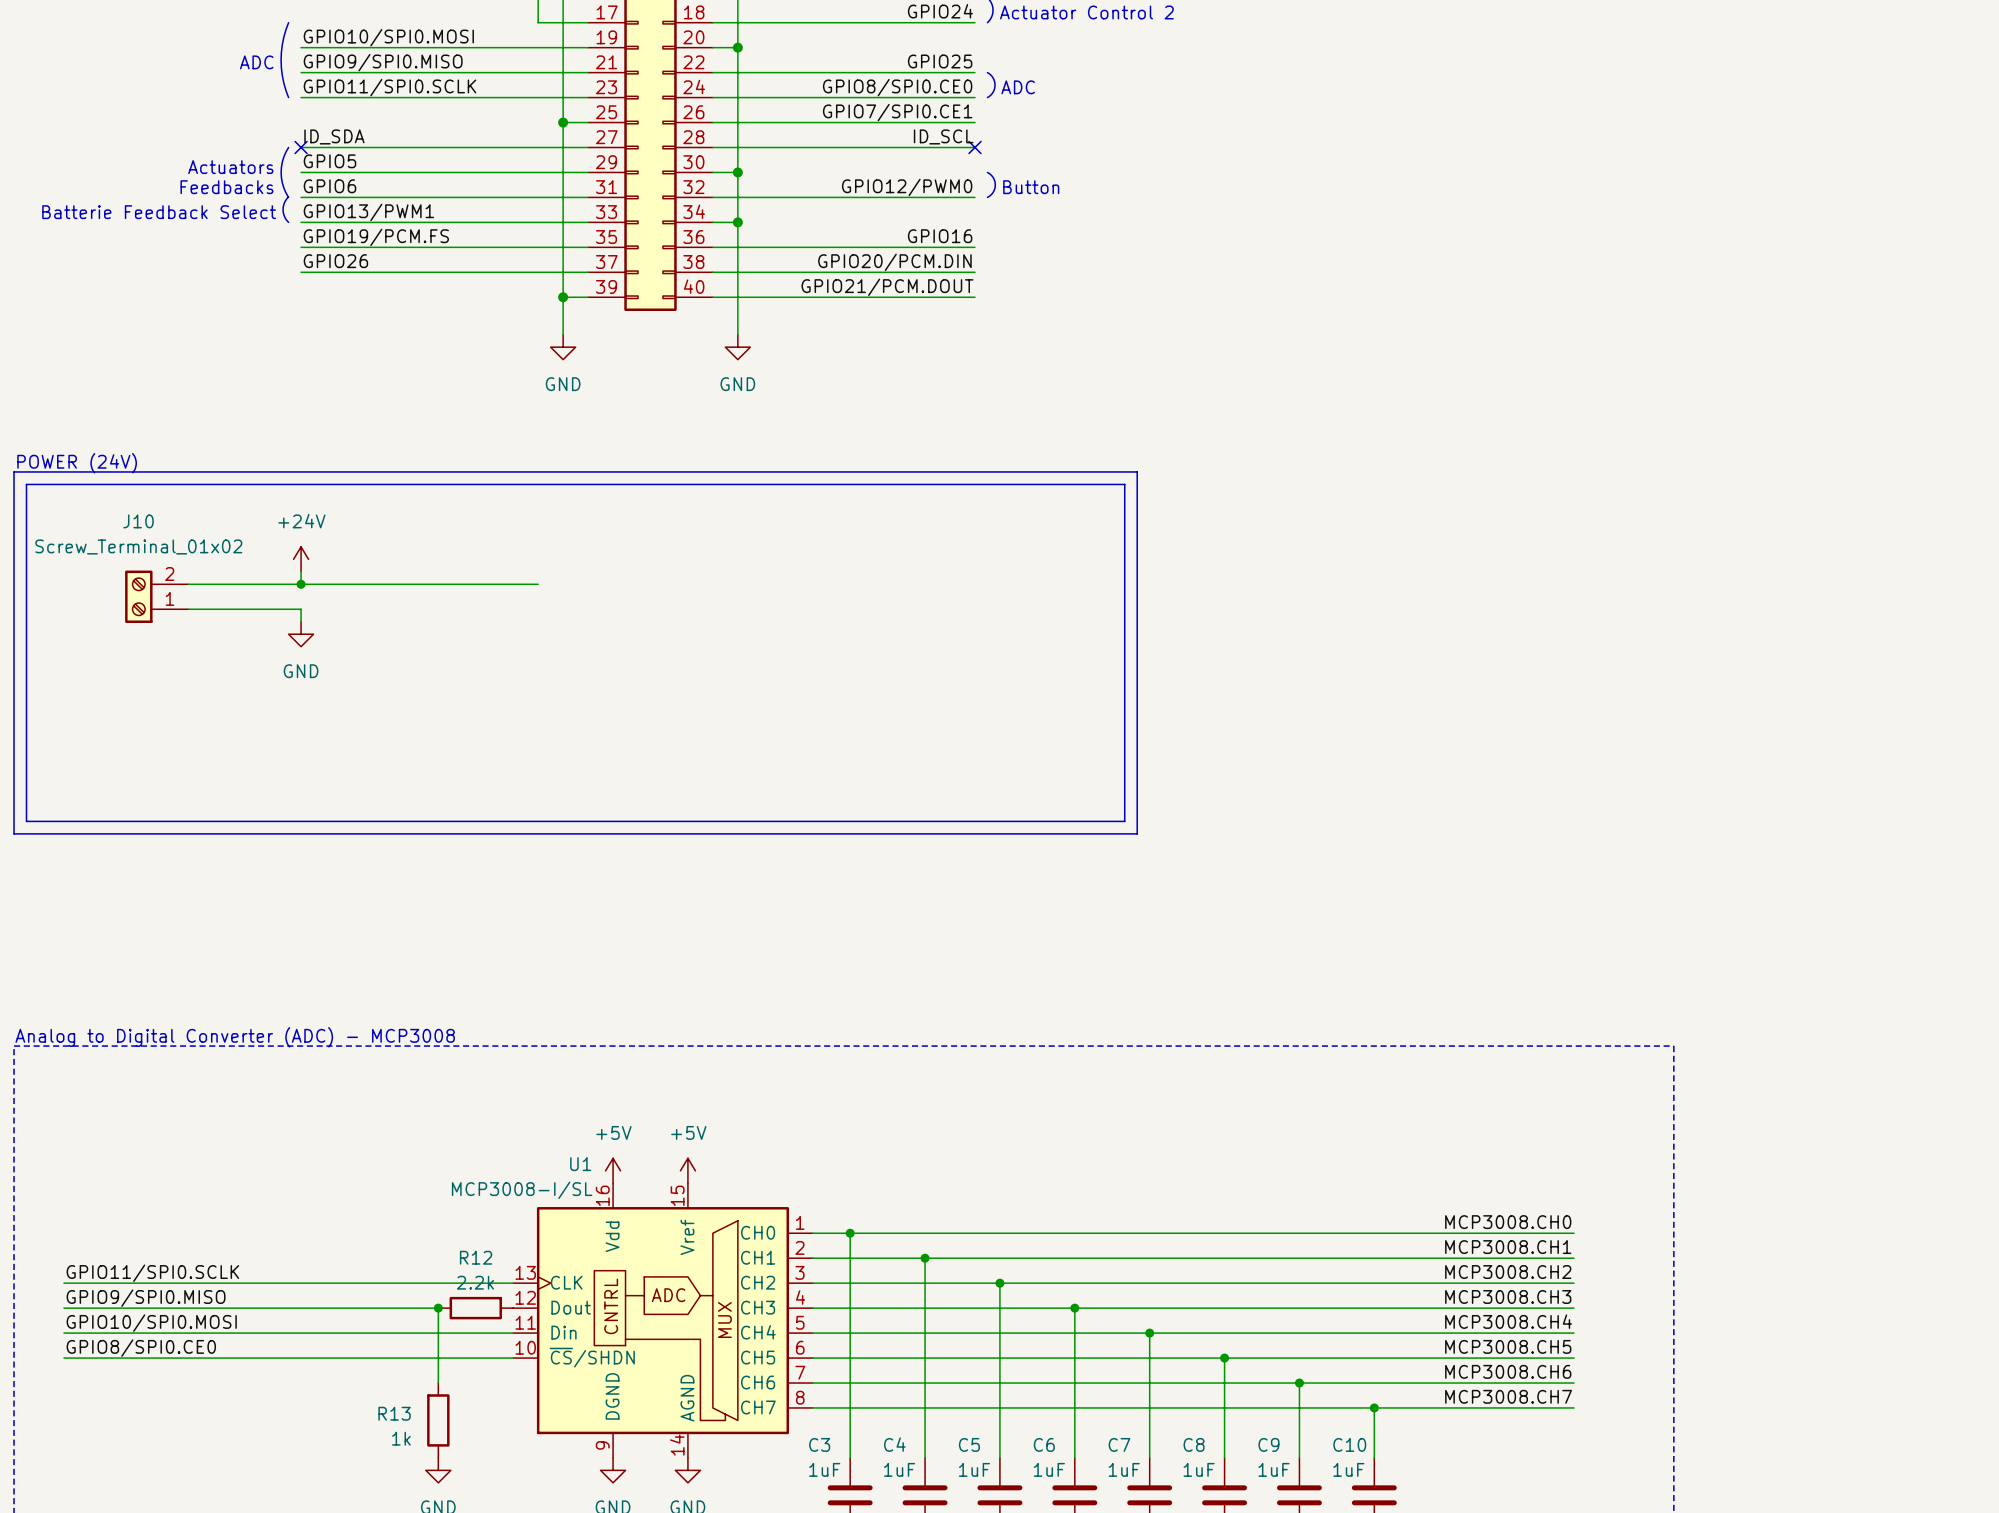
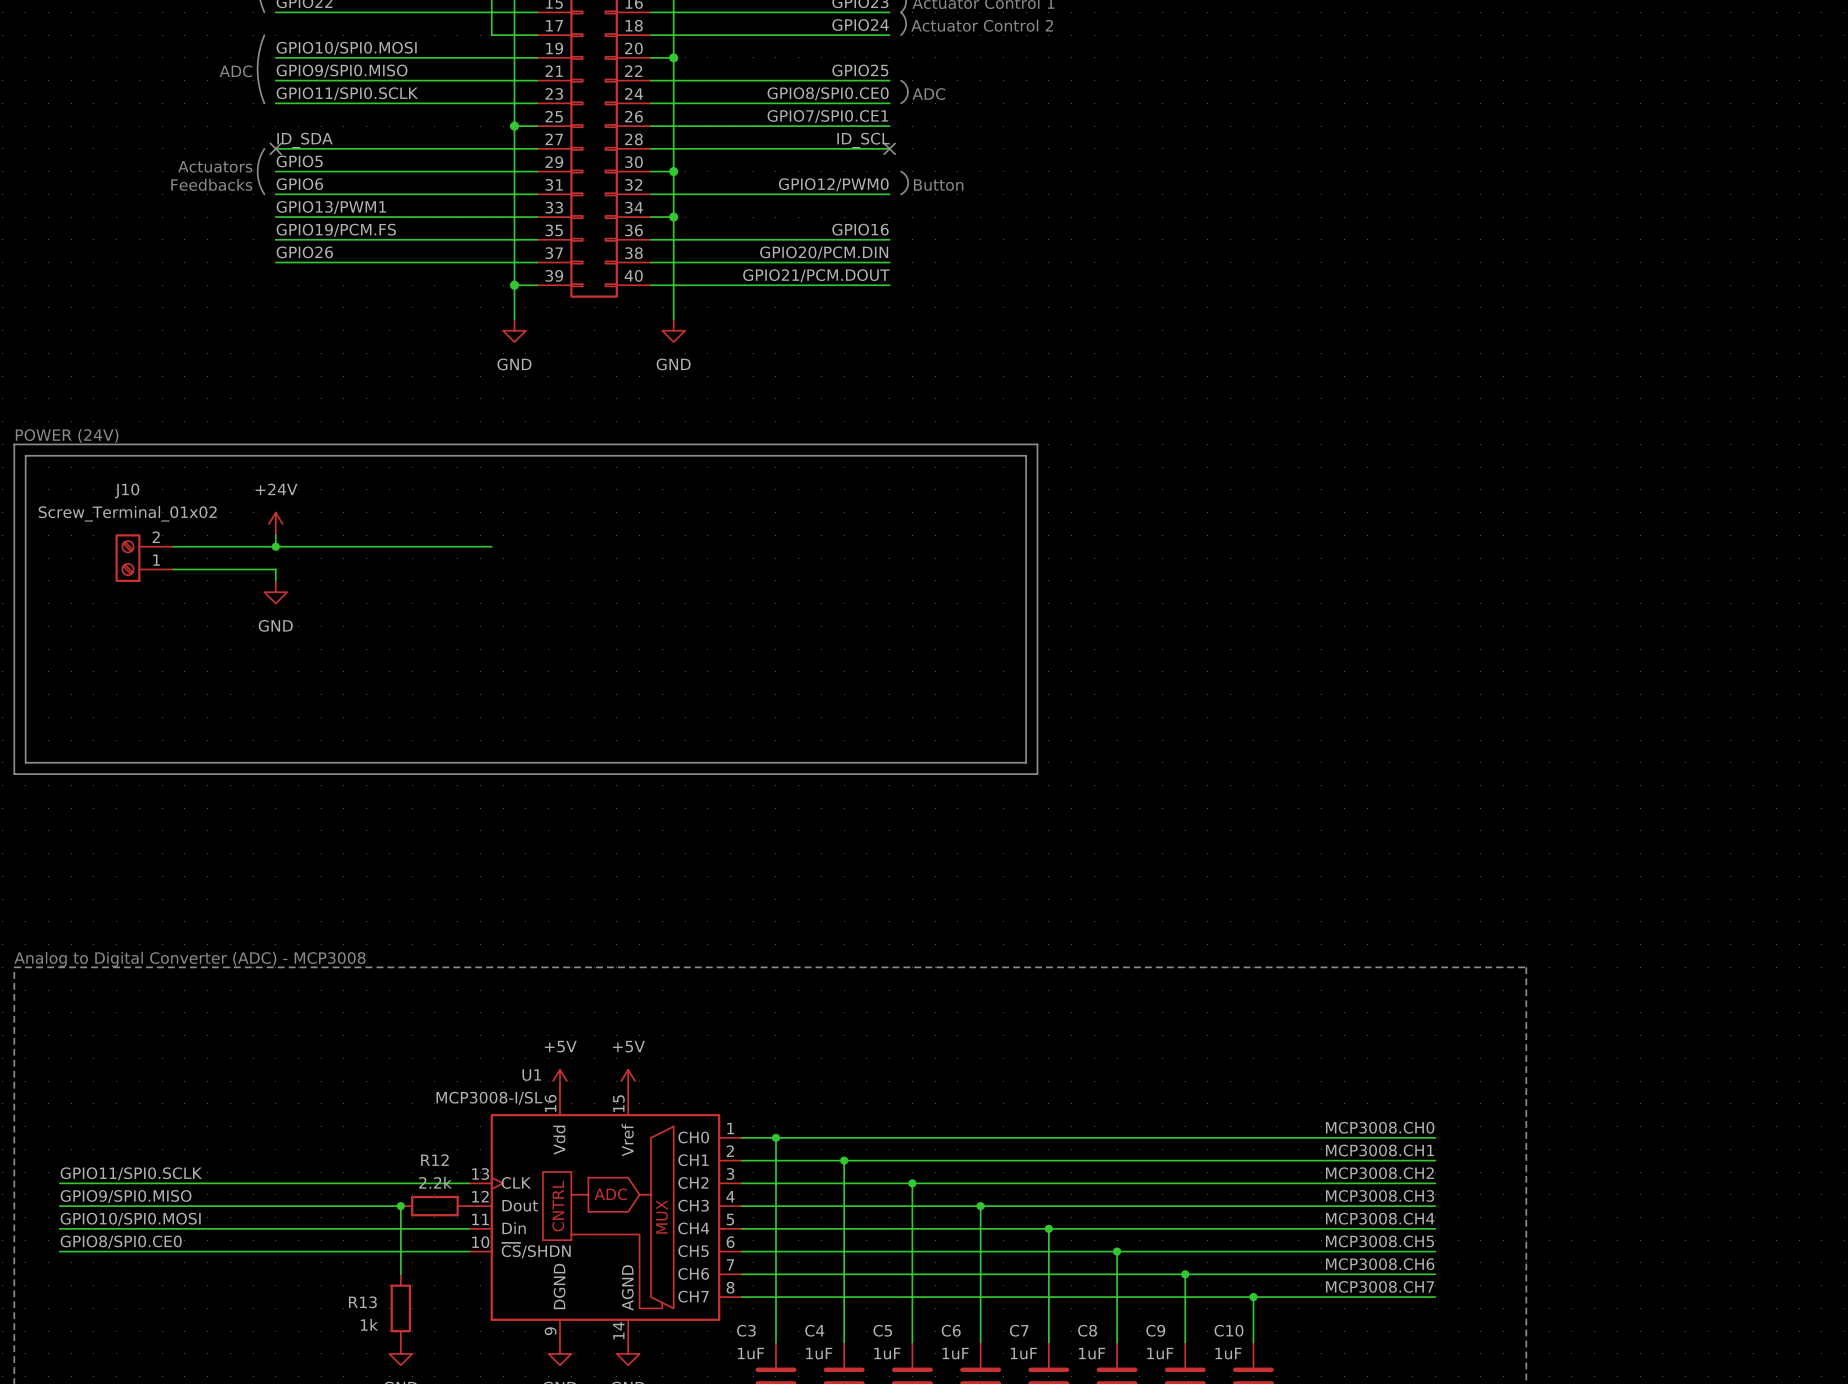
line: (288, 197) (283, 210) (288, 222) -> none
text: Batterie Feedback Select (159, 212) -> none

